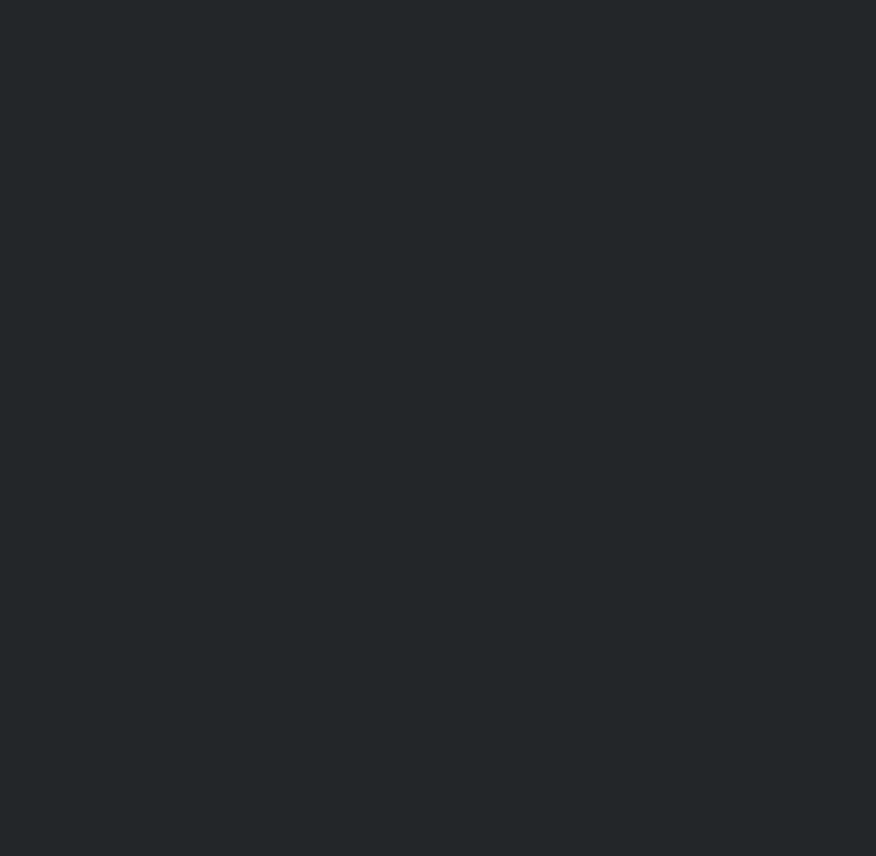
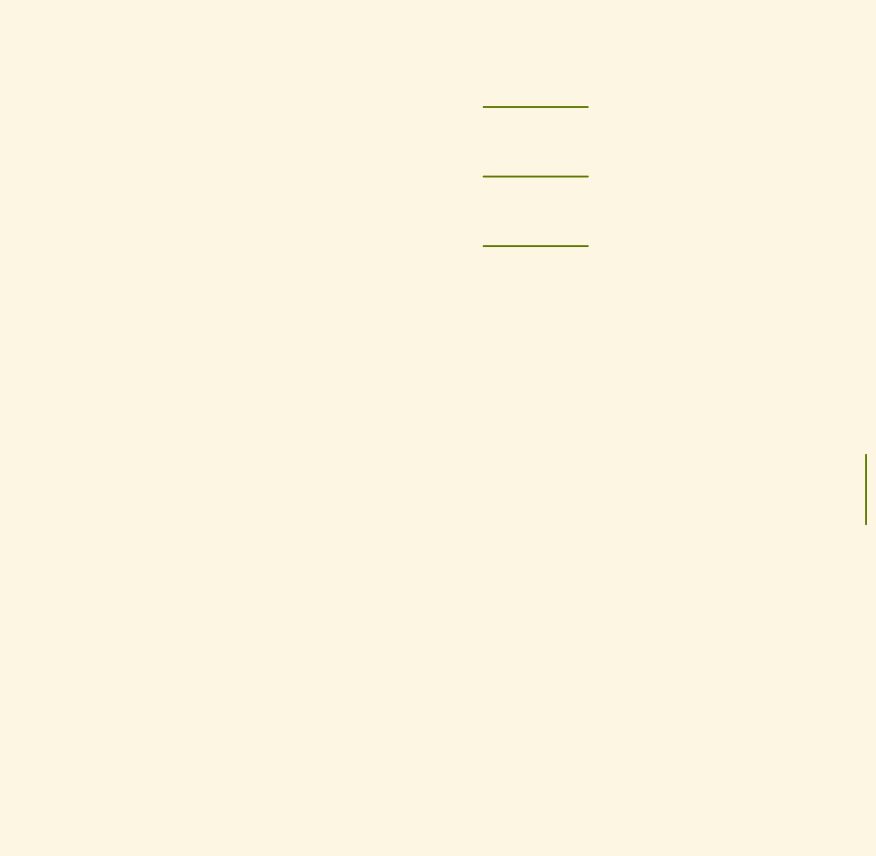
wire: none -> (483, 107) (587, 107)
wire: none -> (483, 176) (587, 176)
wire: none -> (483, 246) (587, 246)
wire: none -> (866, 454) (866, 524)

